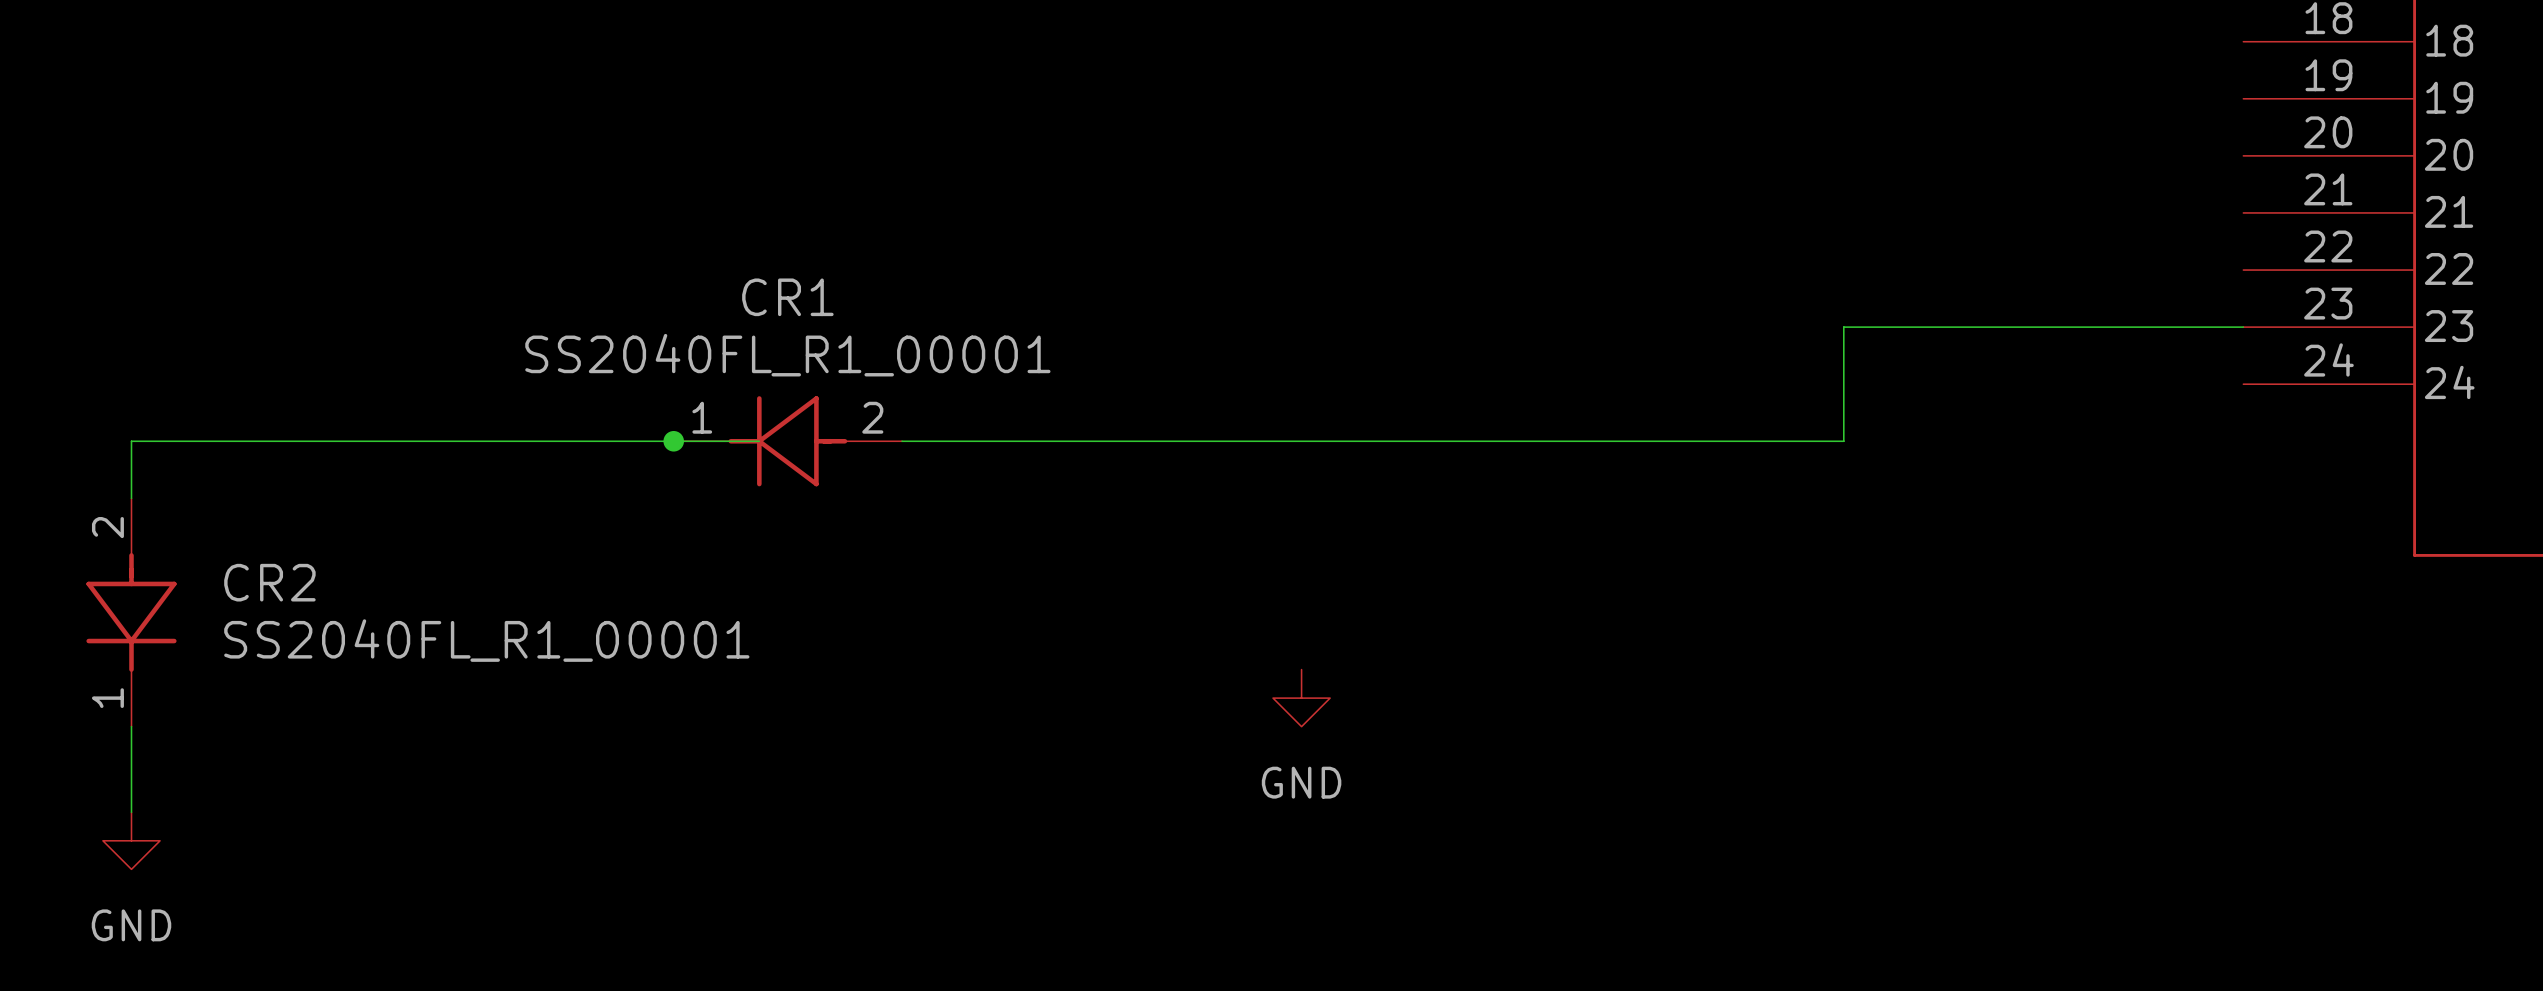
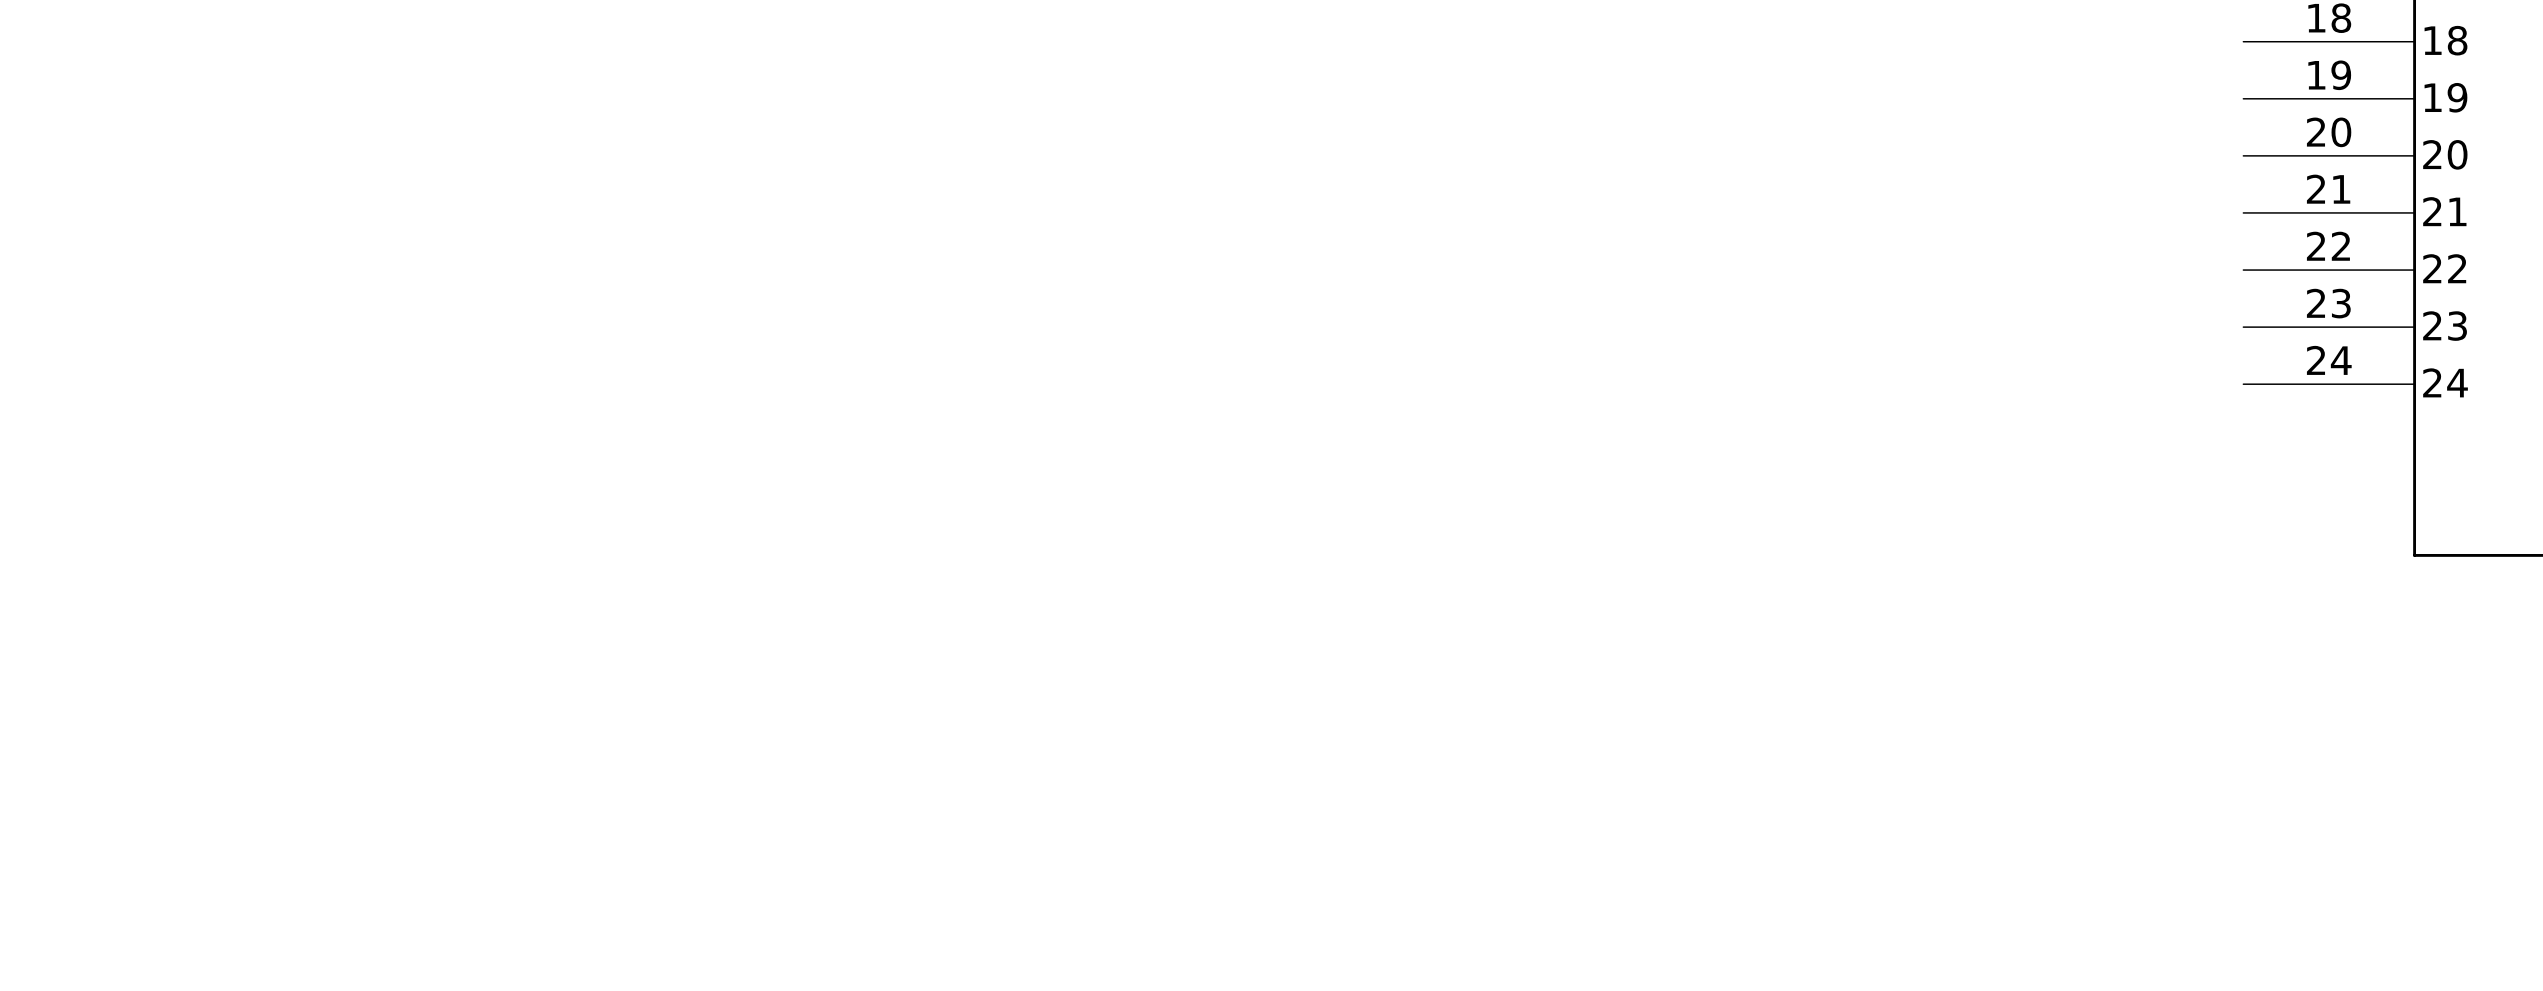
wire: (2243, 327) (1843, 327) (1843, 441) (902, 441) -> none
junction: (673, 441) -> none
wire: (759, 441) (131, 441) (131, 498) -> none
CR1: SS2040FL_R1_00001 (787, 441) -> none
CR2: SS2040FL_R1_00001 (131, 612) -> none
power symbol: GND (1301, 698) -> none
wire: (131, 726) (131, 812) -> none
power symbol: GND (131, 840) -> none

